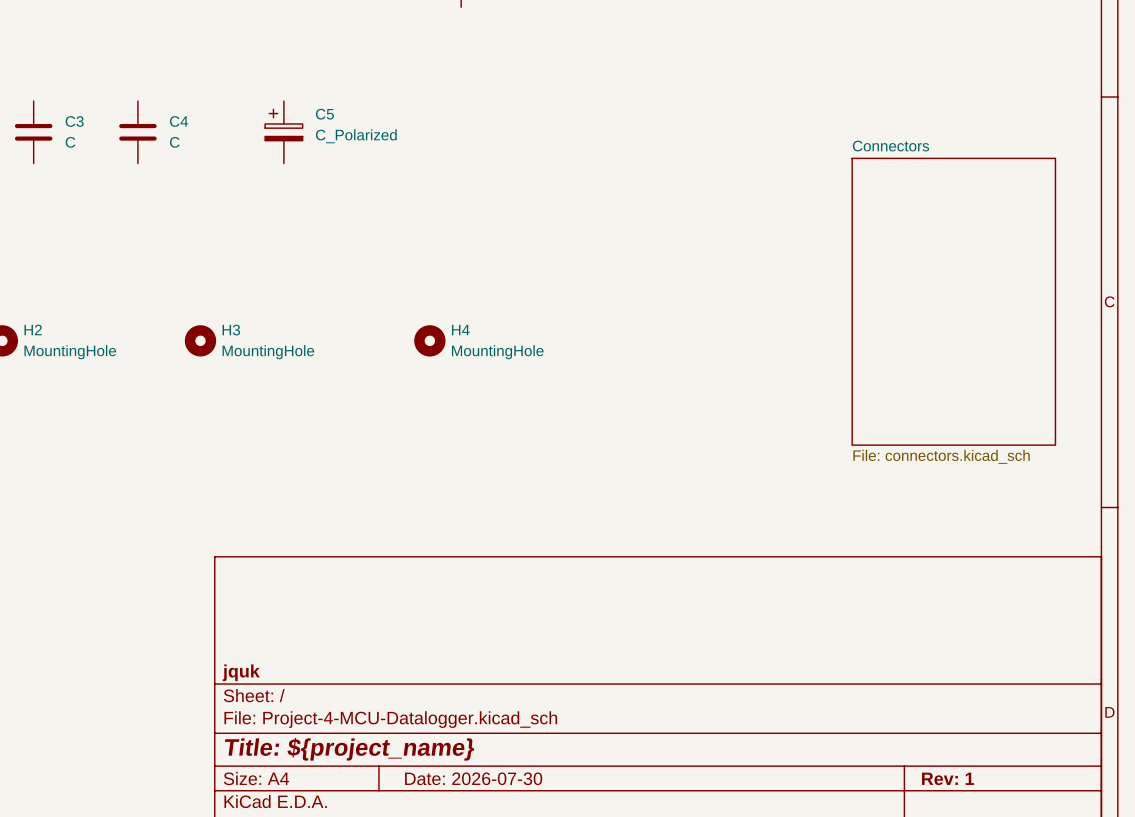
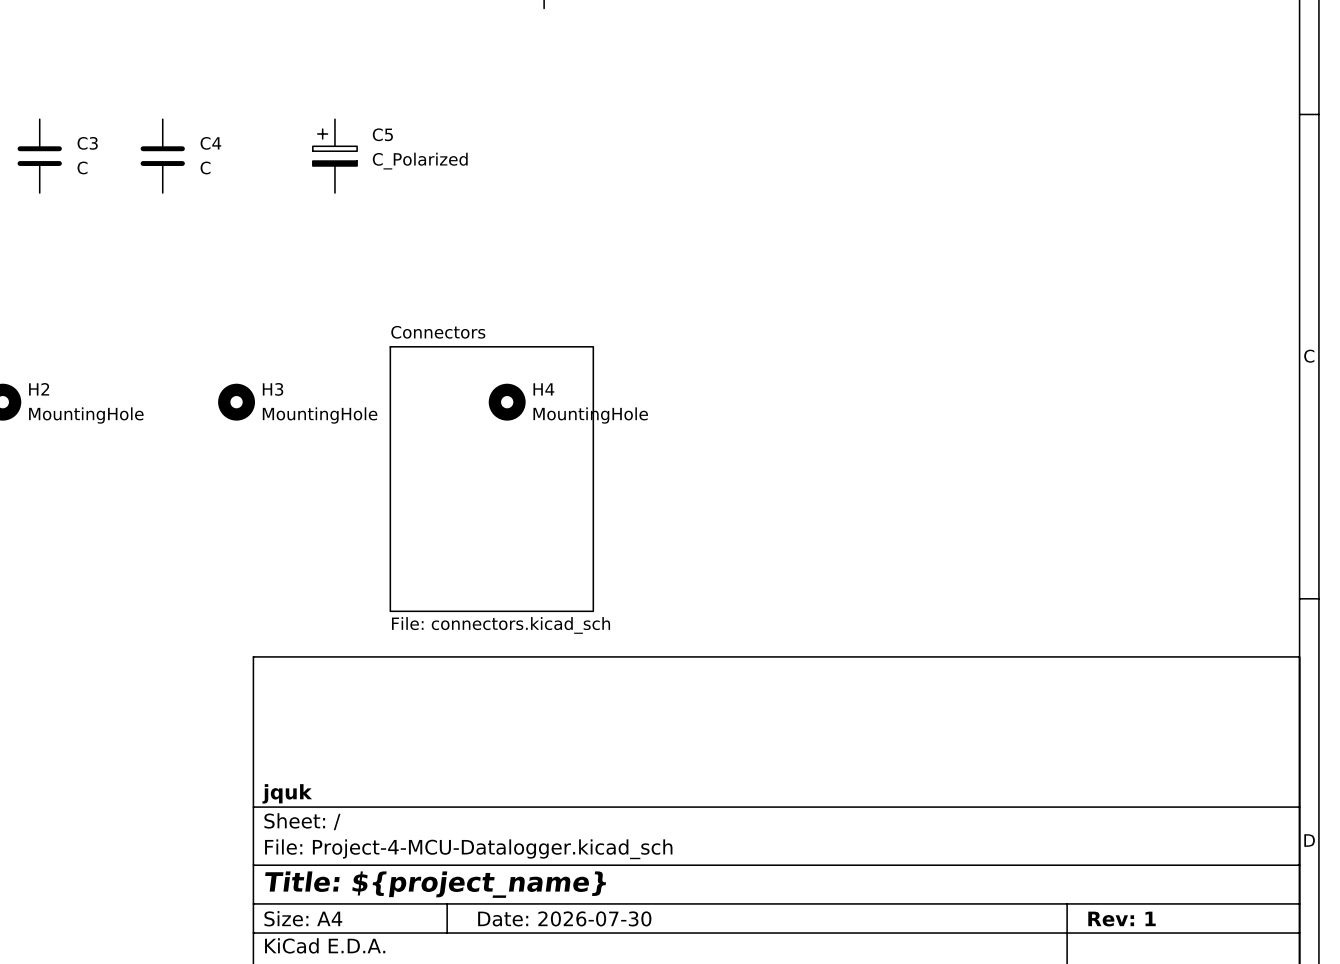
sheet Connectors: File: connectors.kicad_sch (953, 301) -> none
sheet Connectors: none -> File: connectors.kicad_sch (491, 479)

